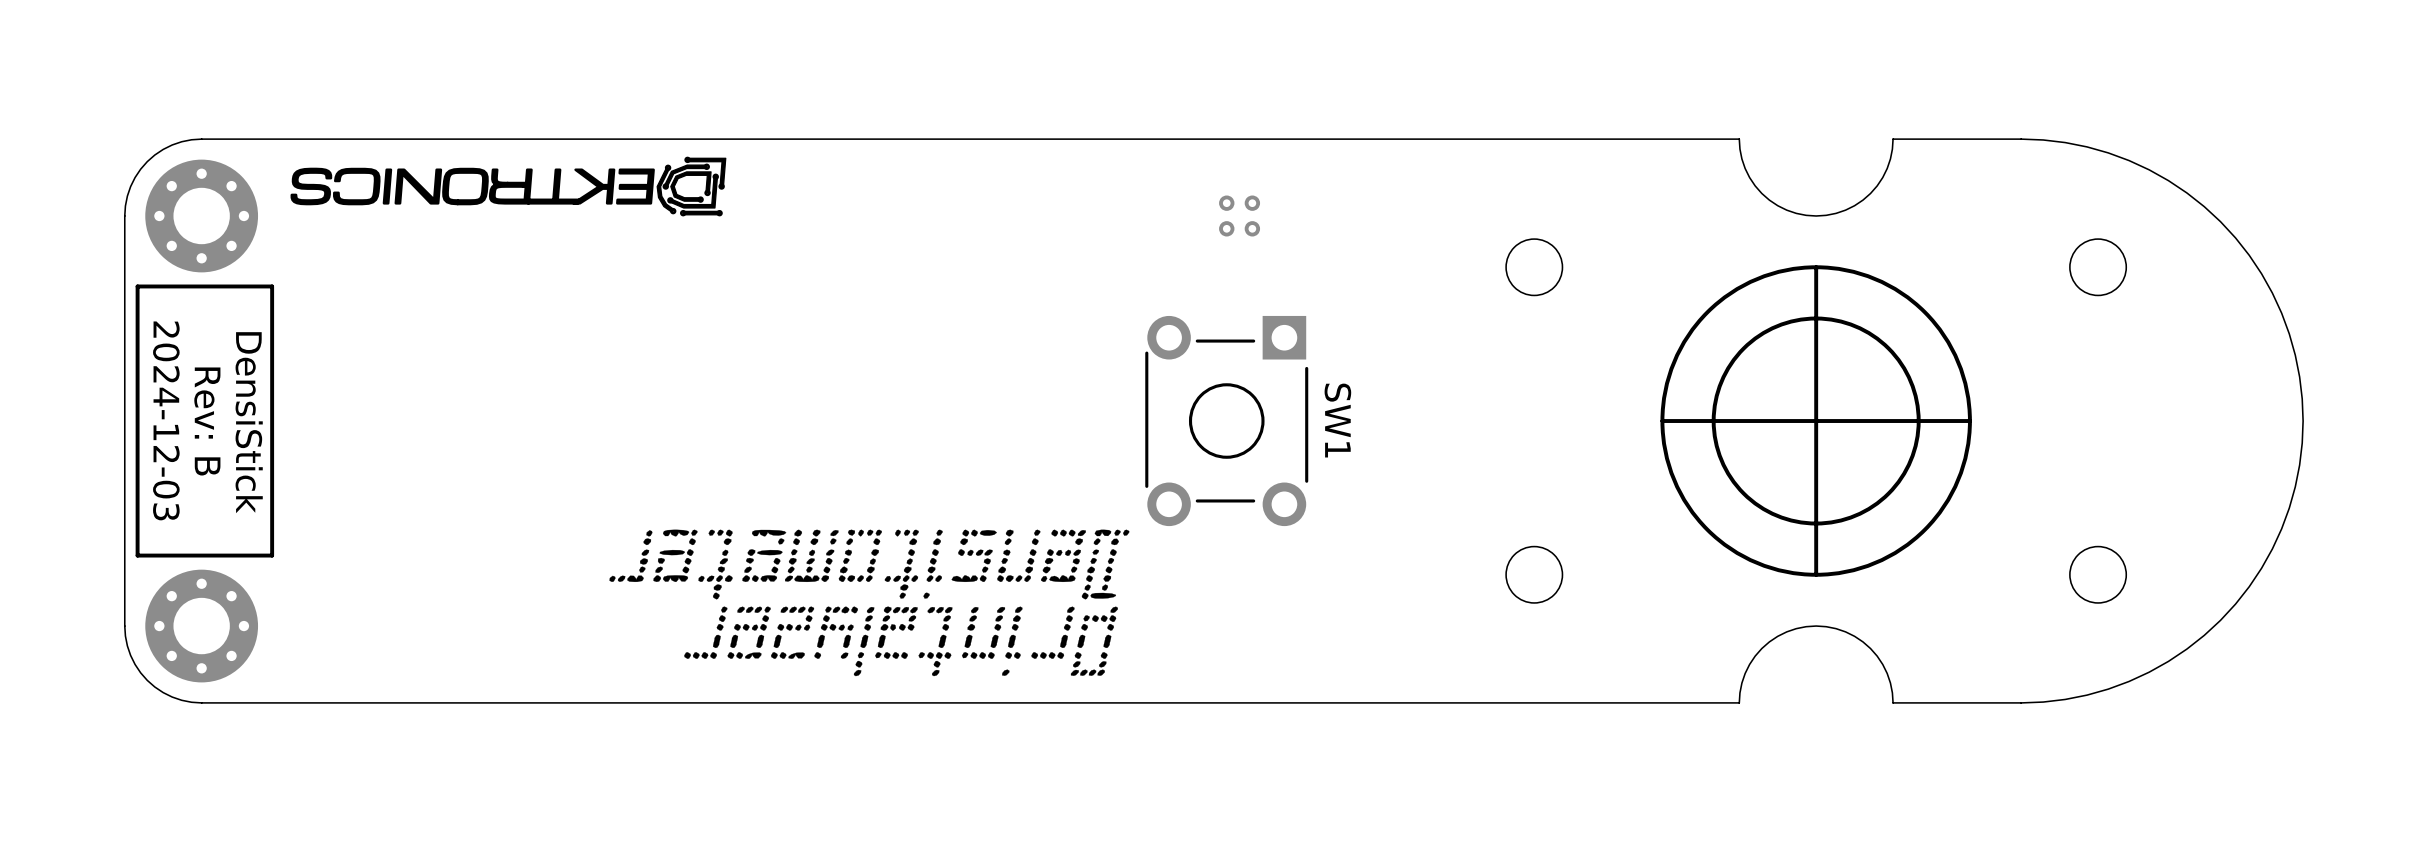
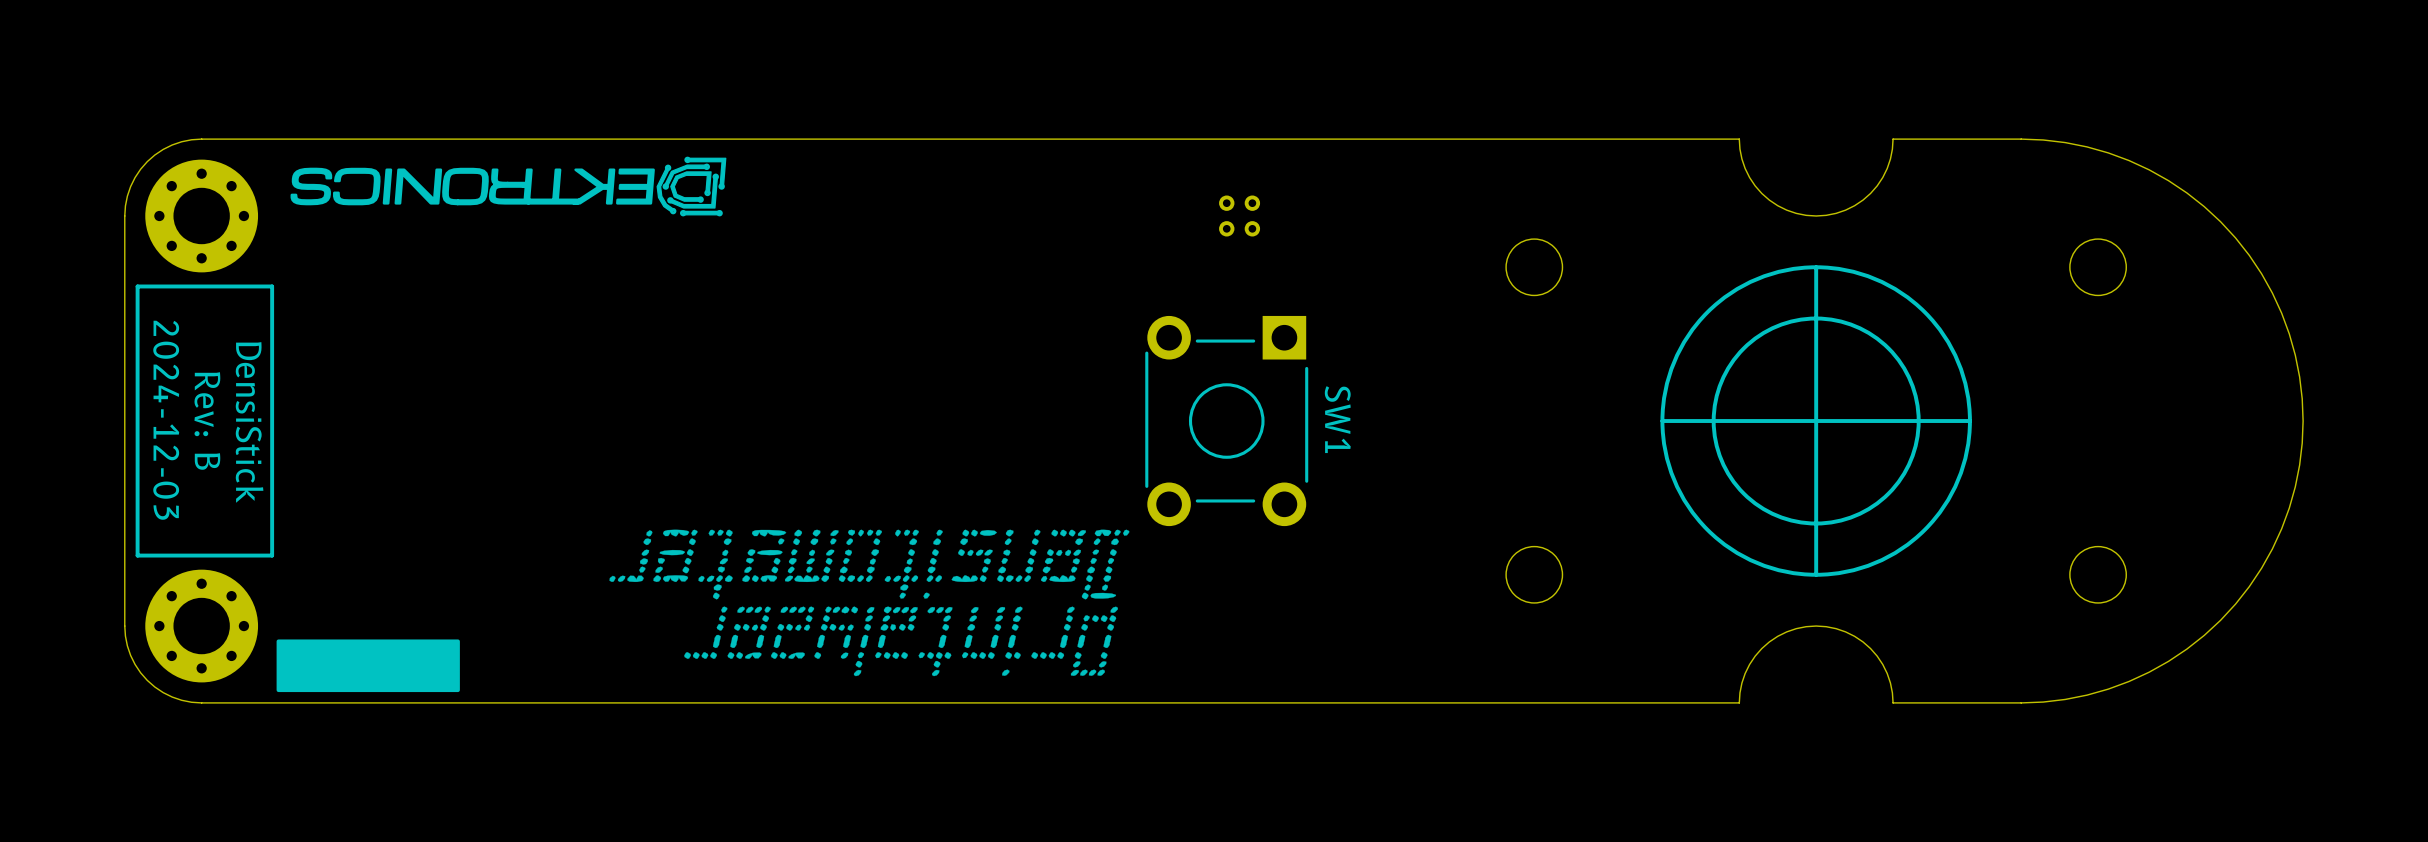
drawing: none -> [276, 639, 460, 693]

